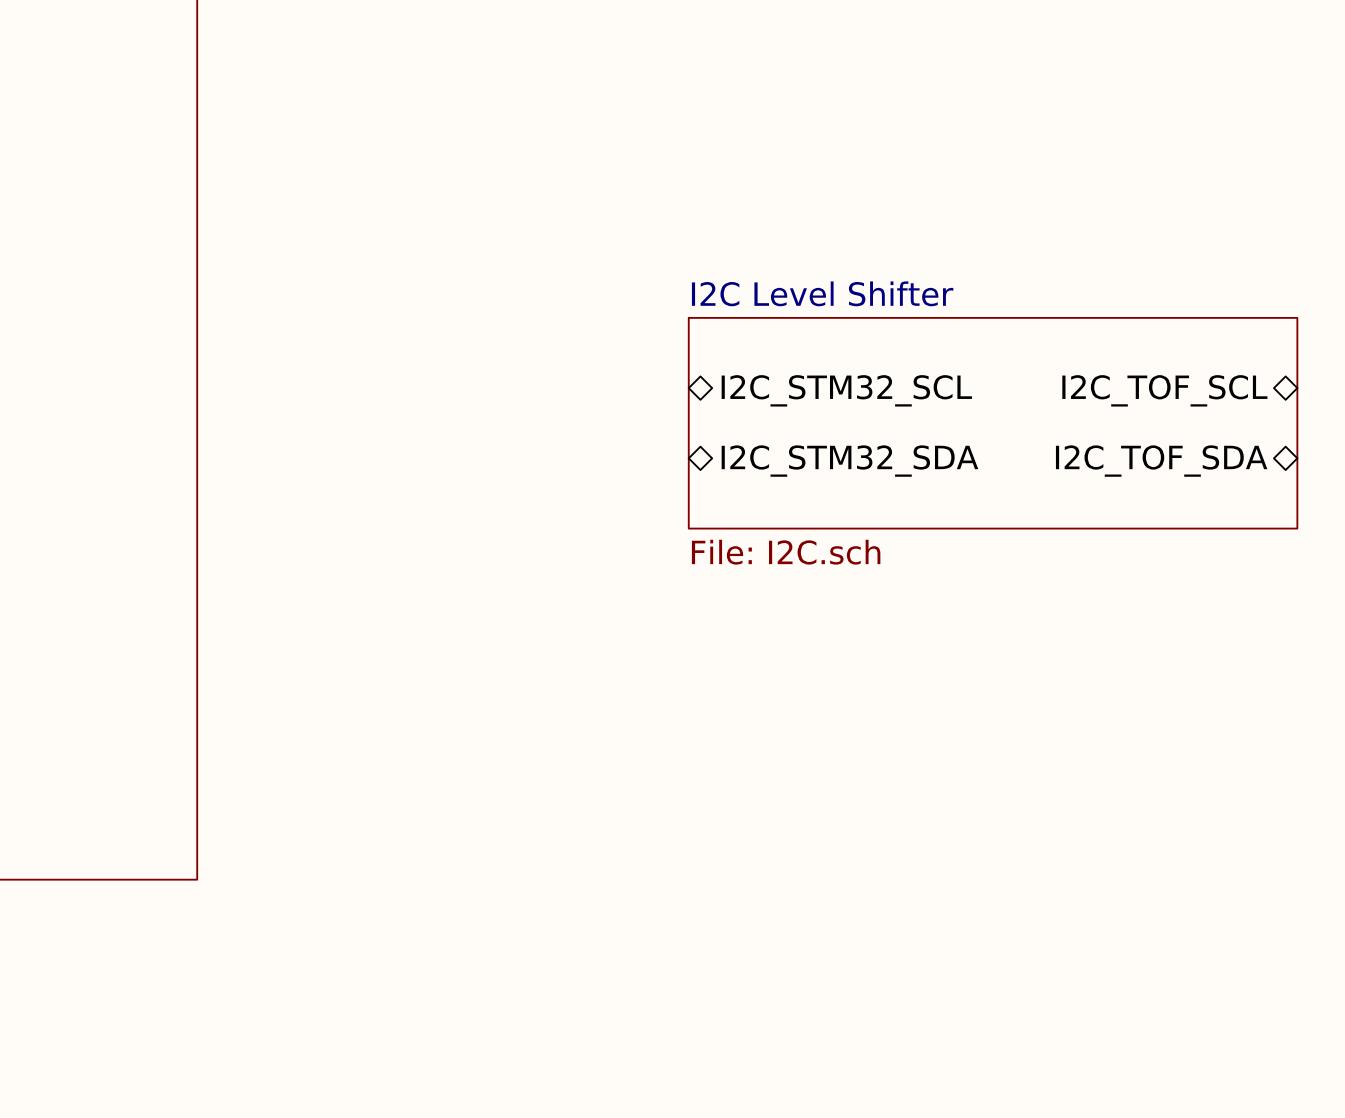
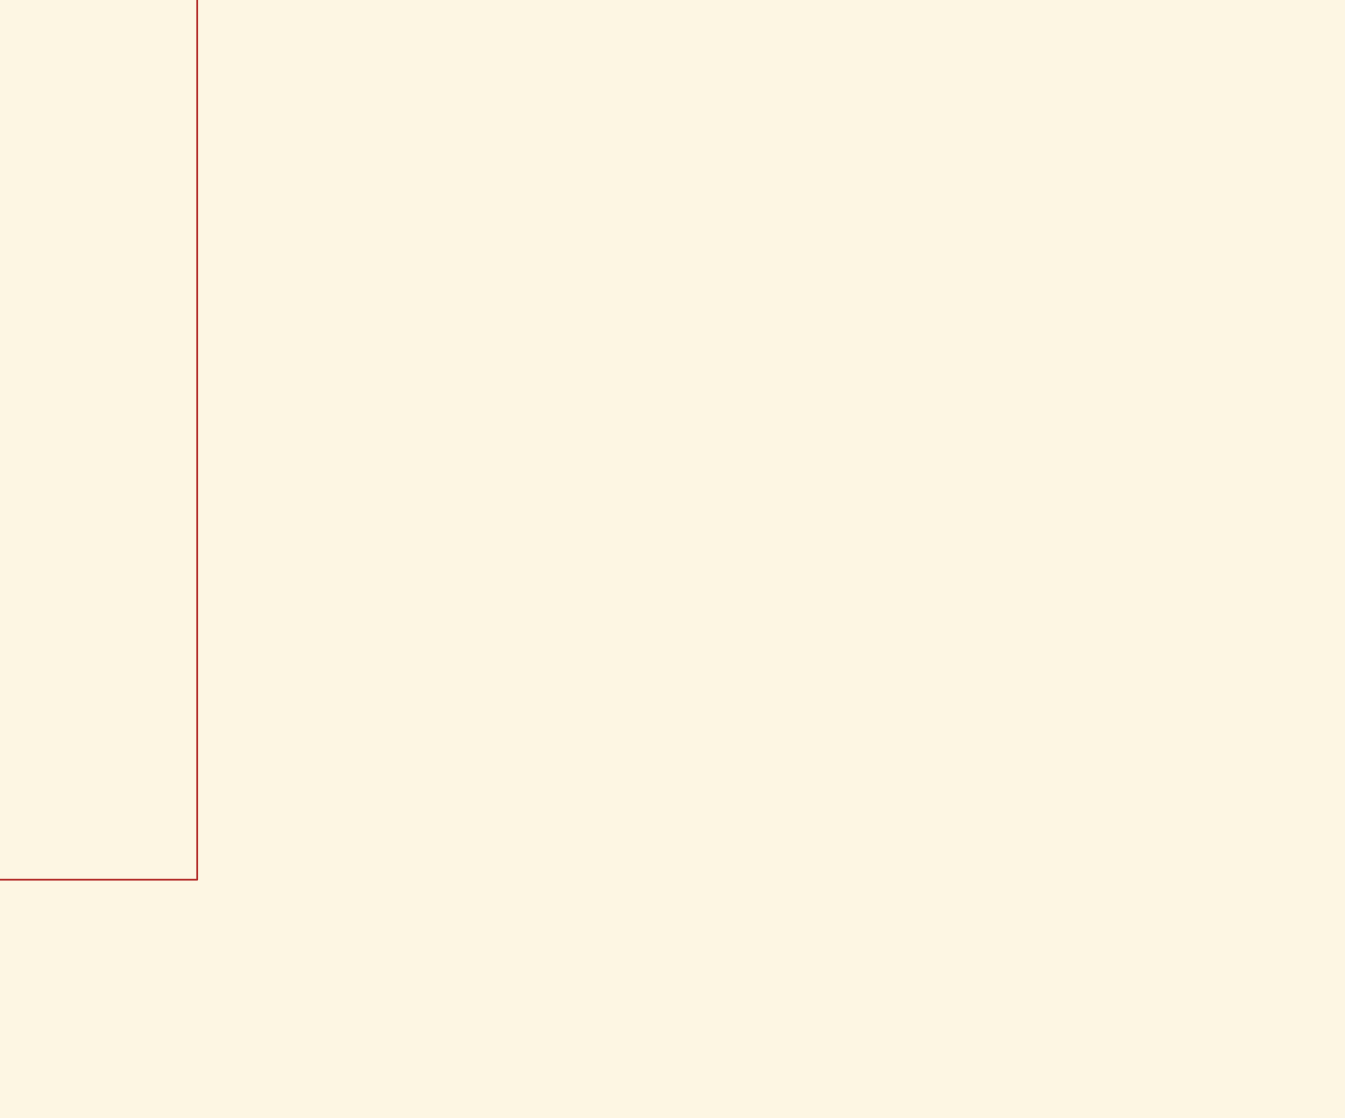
sheet pin: I2C_STM32_SCL (846, 390) -> none
sheet pin: I2C_TOF_SCL (1164, 390) -> none
sheet I2C Level Shifter: File: I2C.sch (993, 423) -> none
sheet pin: I2C_STM32_SDA (849, 461) -> none
sheet pin: I2C_TOF_SDA (1161, 461) -> none

